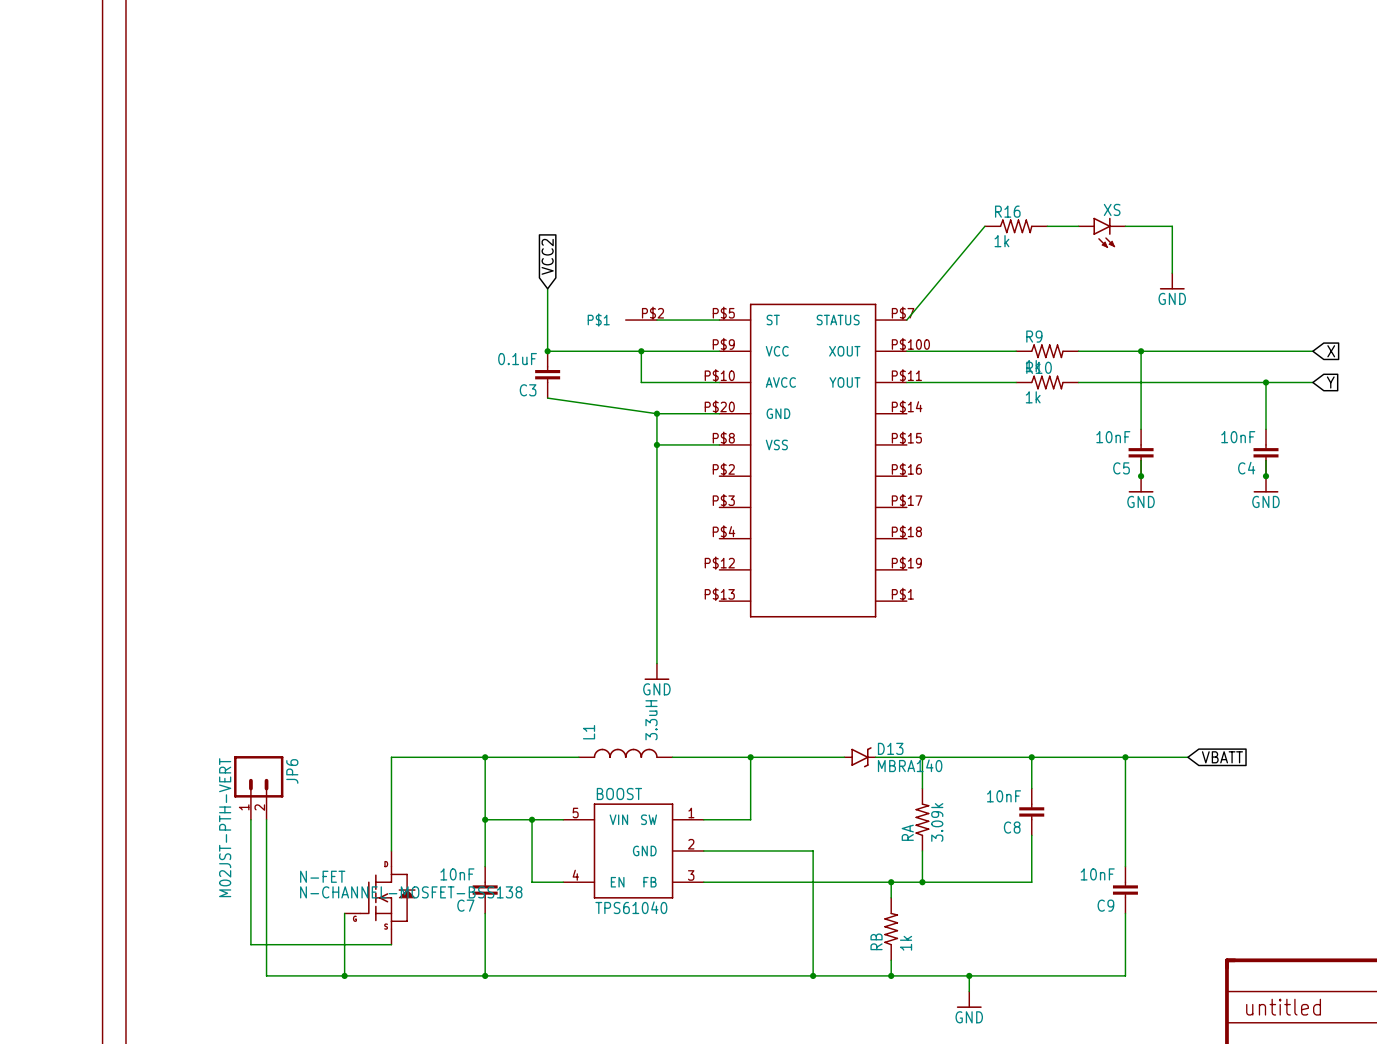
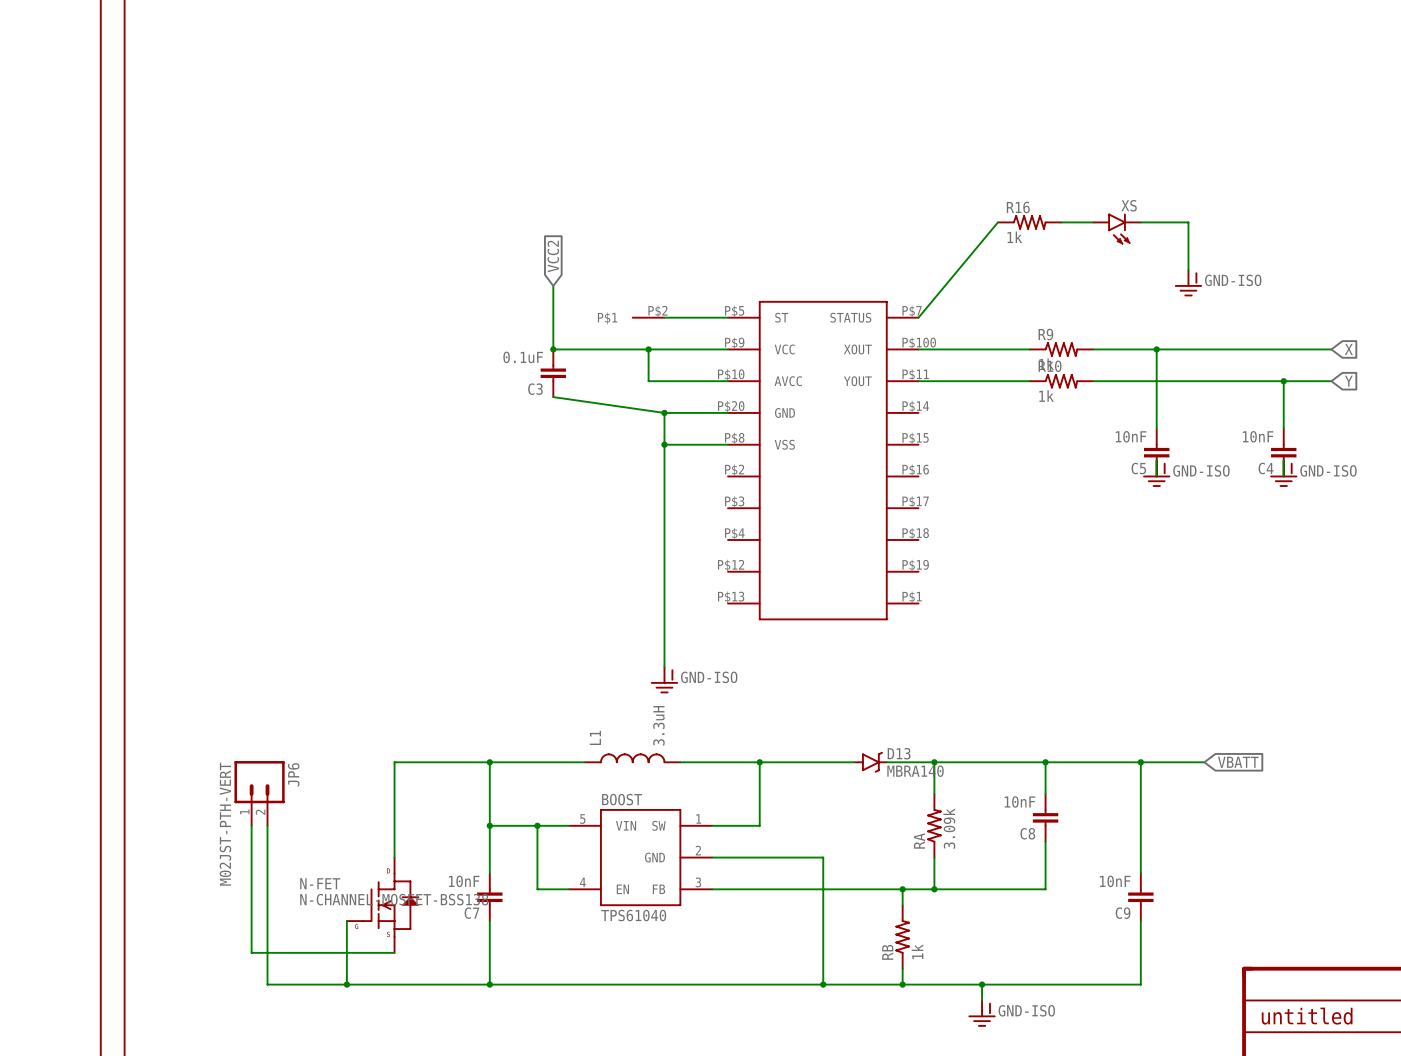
power symbol: GND (1172, 281) -> GND-ISO (1188, 283)
power symbol: none -> GND-ISO (1156, 473)
power symbol: none -> GND-ISO (1283, 473)
junction: (1141, 476) -> none
junction: (1266, 476) -> none
power symbol: GND (1141, 484) -> none
power symbol: GND (1266, 484) -> none
power symbol: GND (656, 671) -> GND-ISO (664, 680)
power symbol: GND (969, 999) -> GND-ISO (982, 1013)

